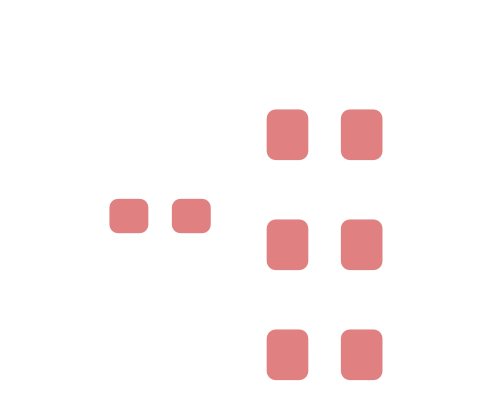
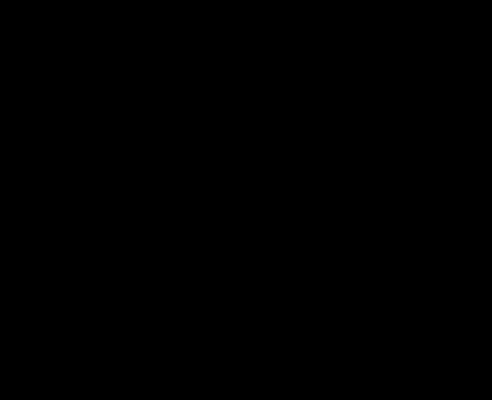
part: (324, 134) -> none
part: (160, 216) -> none
part: (324, 244) -> none
part: (324, 354) -> none

